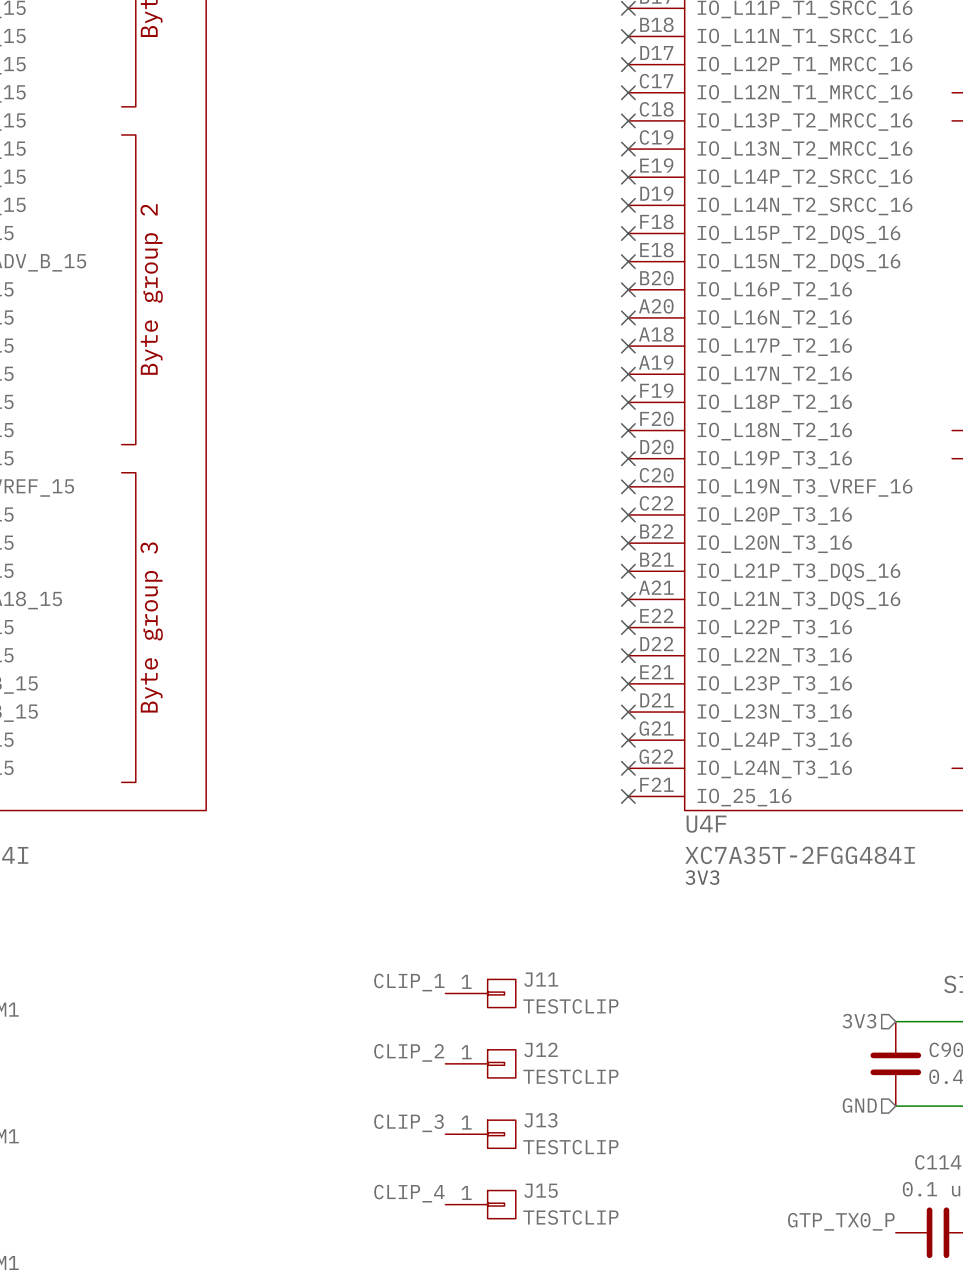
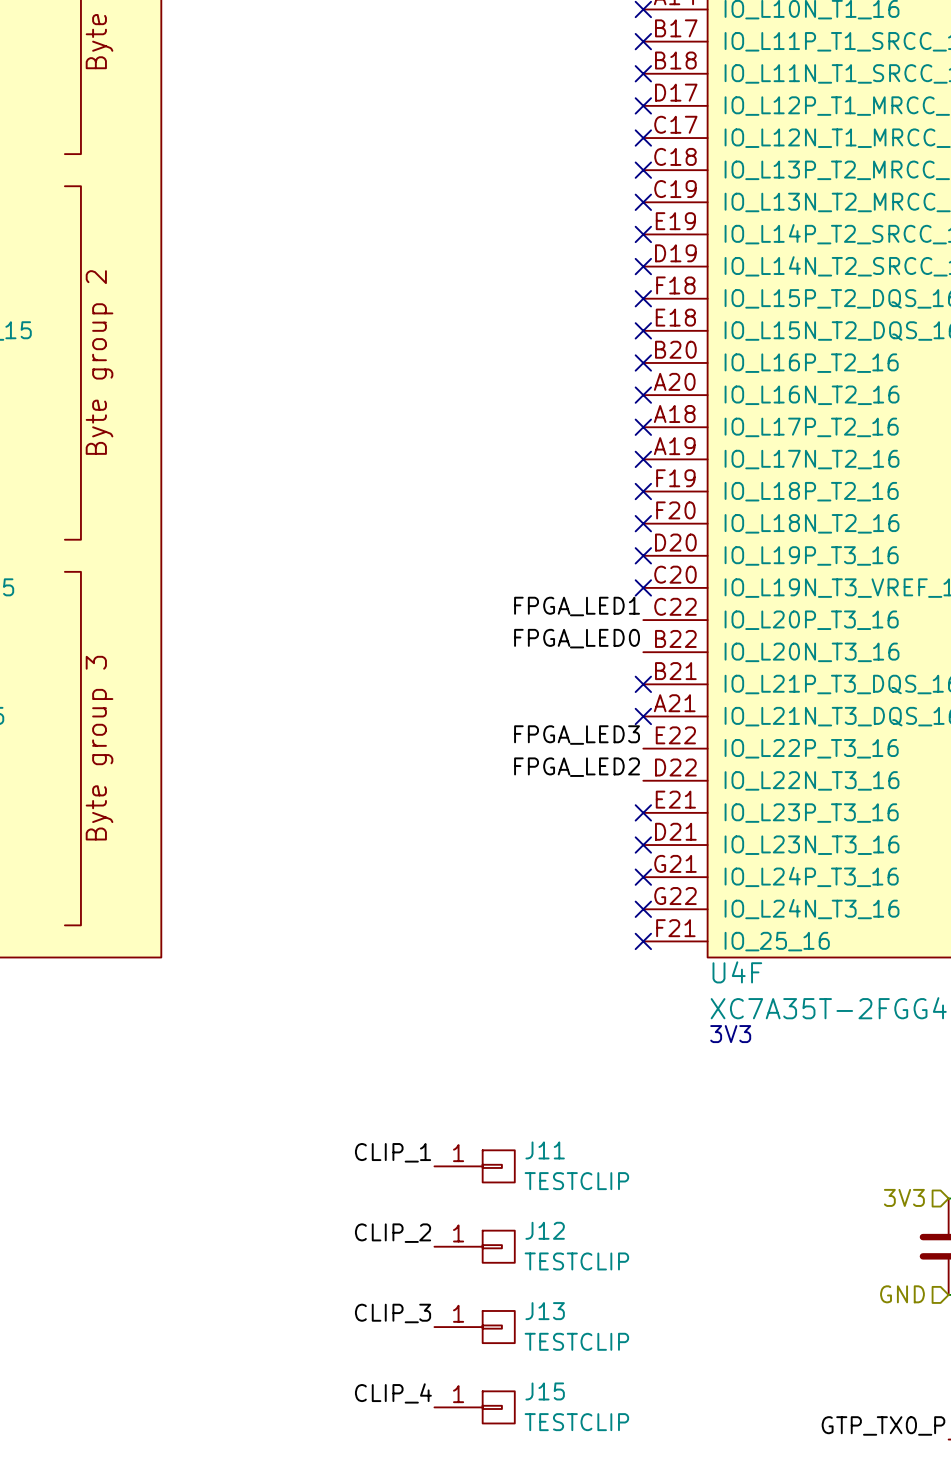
label: none -> FPGA_LED1 (577, 606)
no-connect mark: (628, 514) -> none
label: none -> FPGA_LED0 (577, 638)
no-connect mark: (628, 543) -> none
label: none -> FPGA_LED3 (577, 735)
no-connect mark: (628, 627) -> none
label: none -> FPGA_LED2 (577, 767)
no-connect mark: (628, 655) -> none

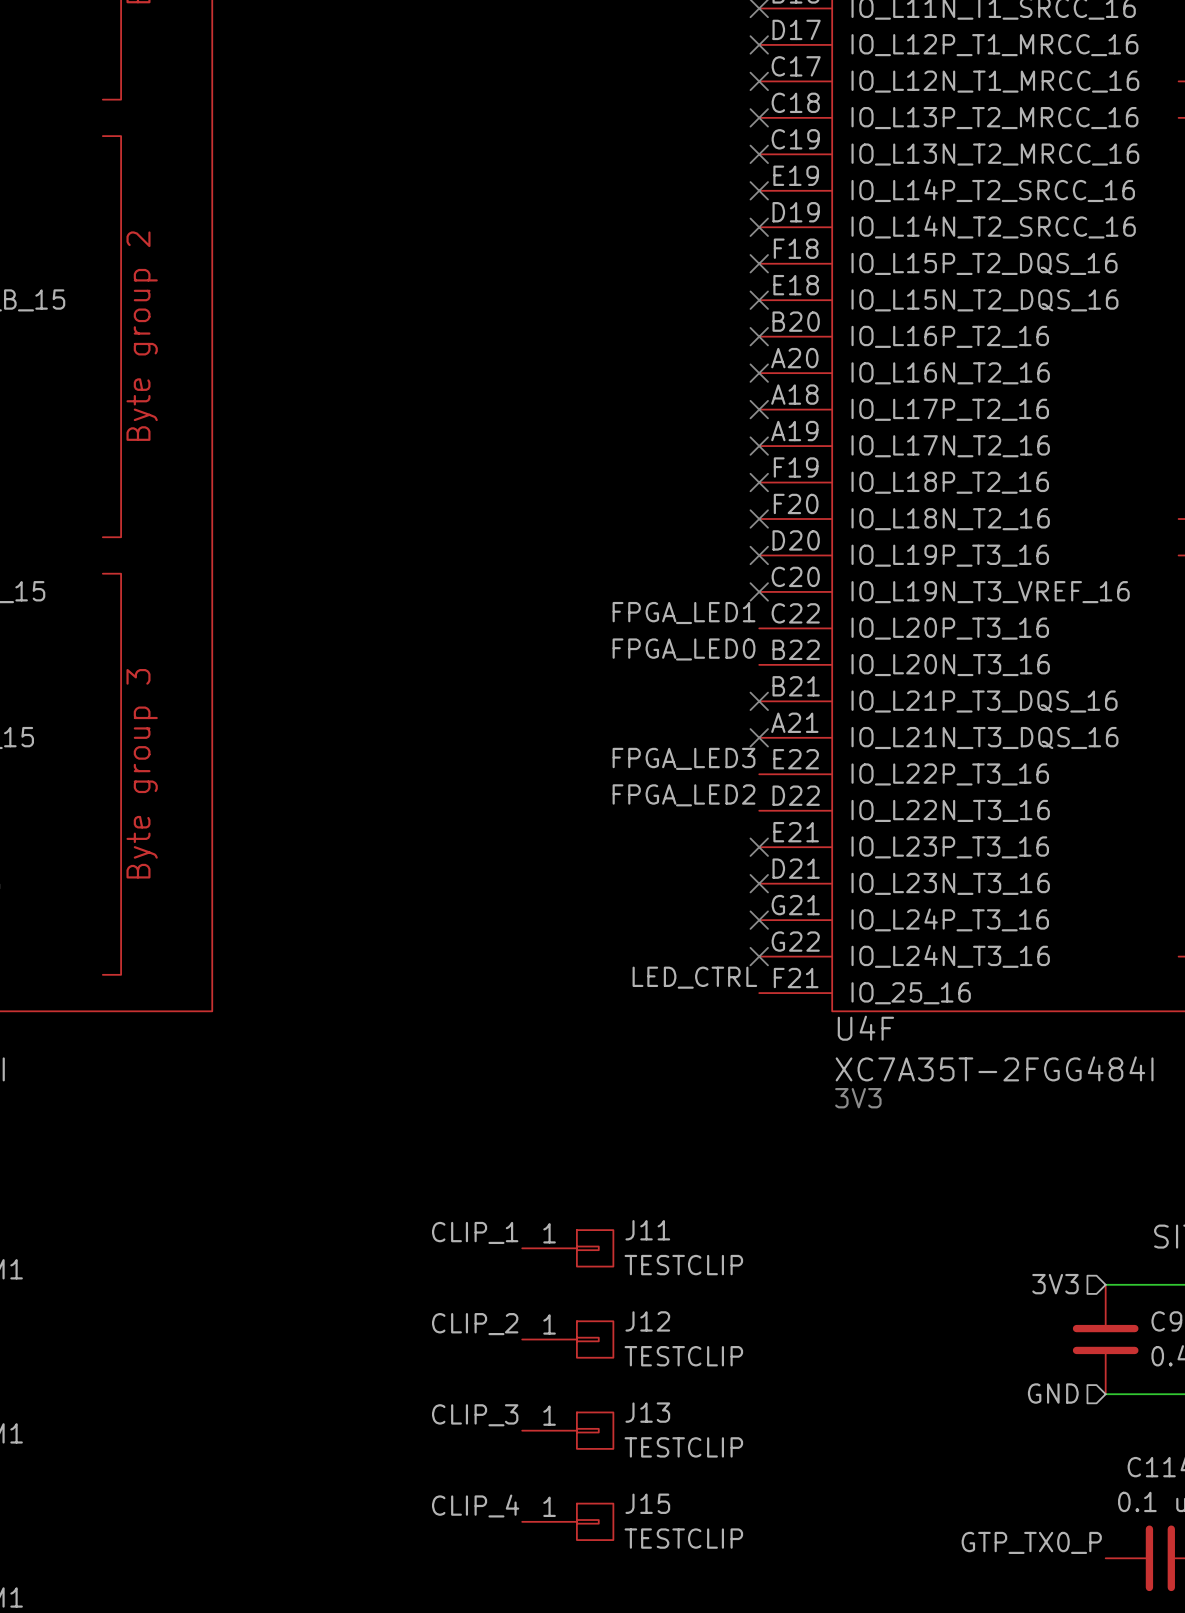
label: none -> LED_CTRL (694, 977)
no-connect mark: (643, 941) -> none

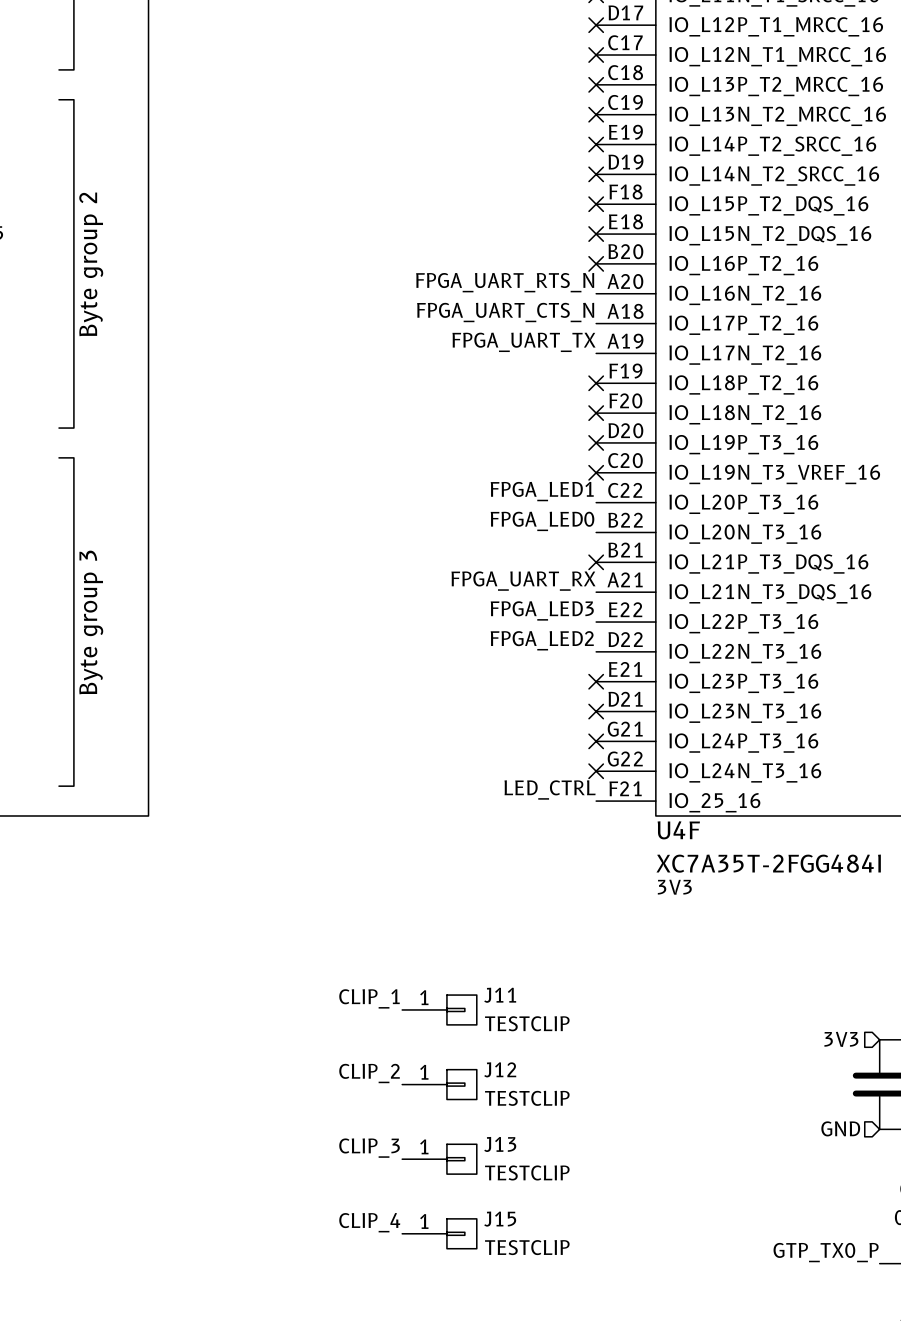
label: none -> FPGA_UART_RTS_N (505, 282)
no-connect mark: (759, 373) -> none
label: none -> FPGA_UART_CTS_N (505, 312)
no-connect mark: (759, 409) -> none
label: none -> FPGA_UART_TX (523, 342)
no-connect mark: (759, 446) -> none
label: none -> FPGA_UART_RX (523, 581)
no-connect mark: (759, 737) -> none

